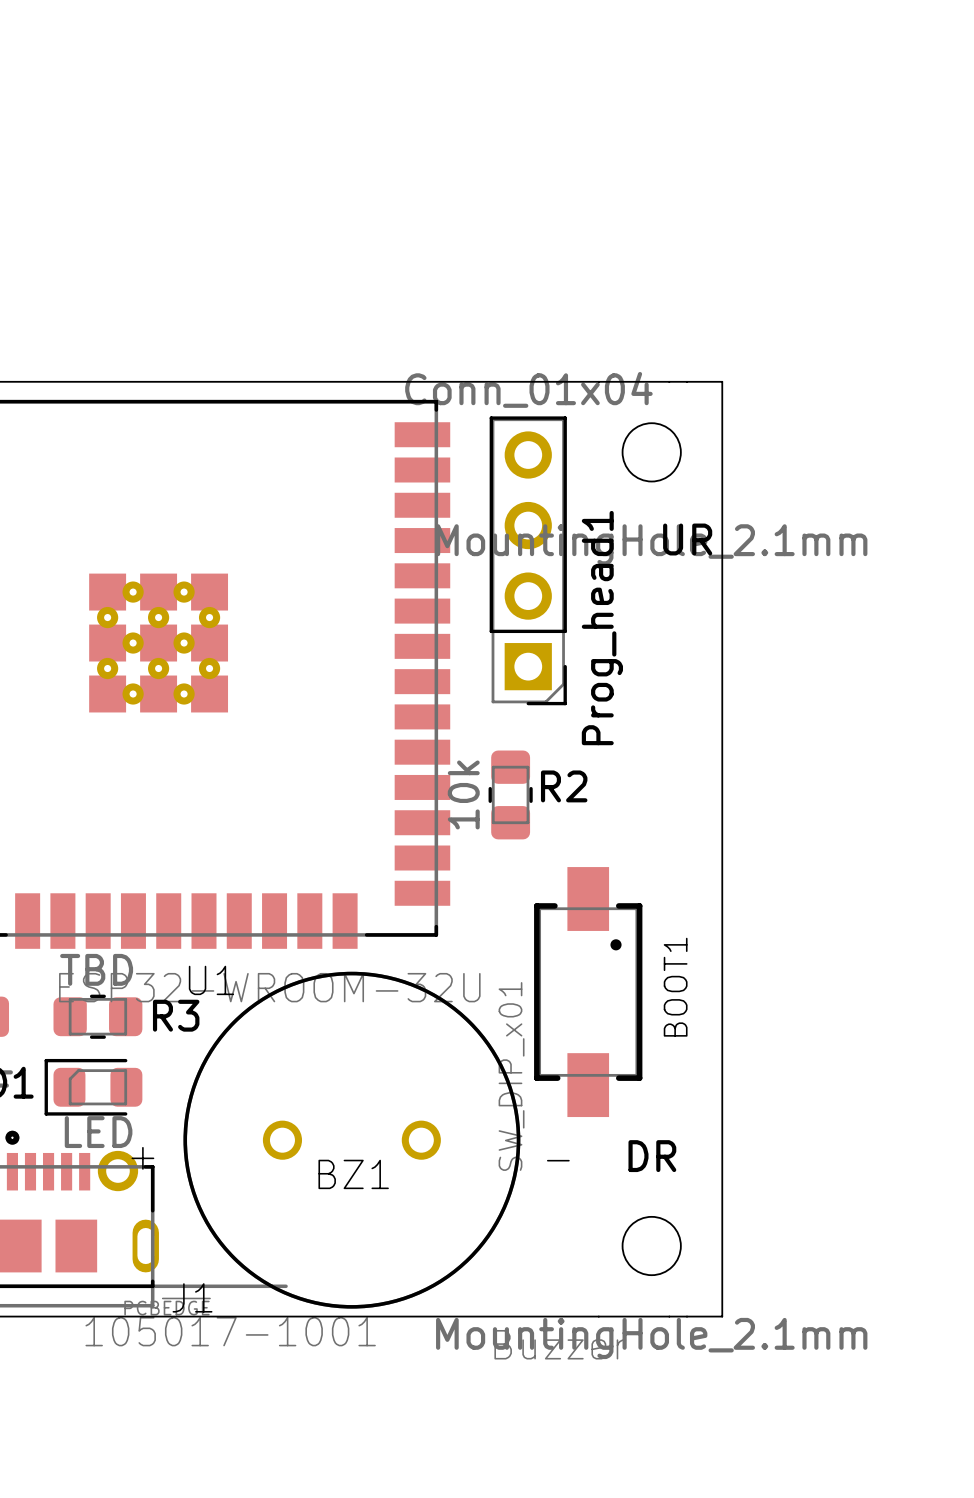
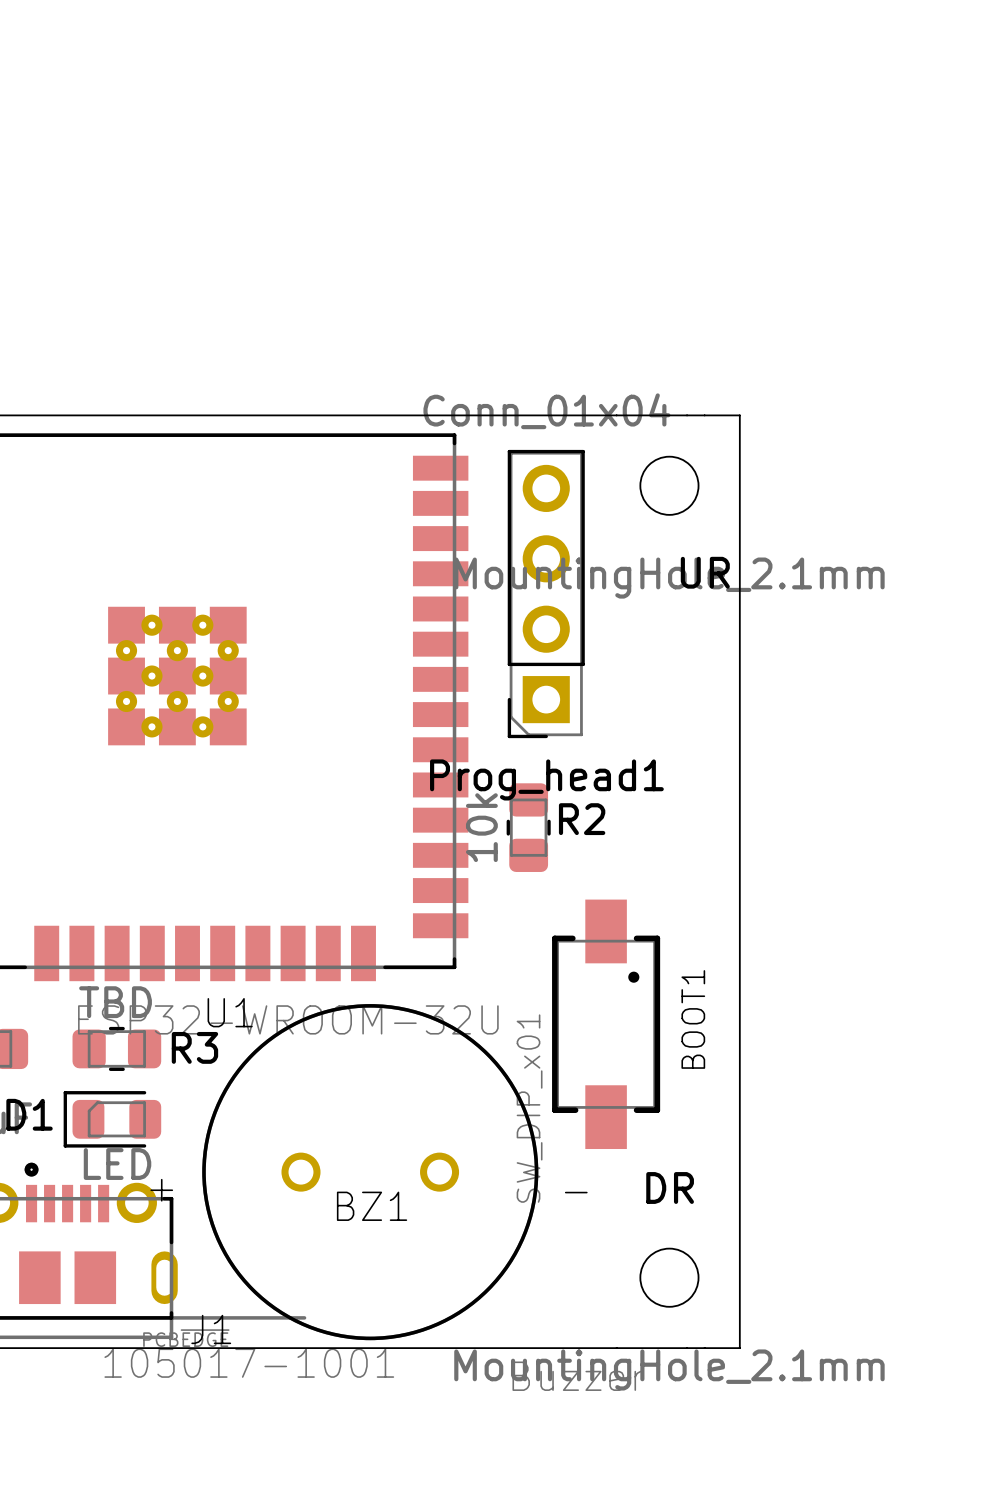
Prog_head1 footprint: [489, 416, 567, 706] -> [507, 449, 585, 739]
Prog_head1 name position: Prog_head1 (602, 628) -> Prog_head1 (546, 779)

